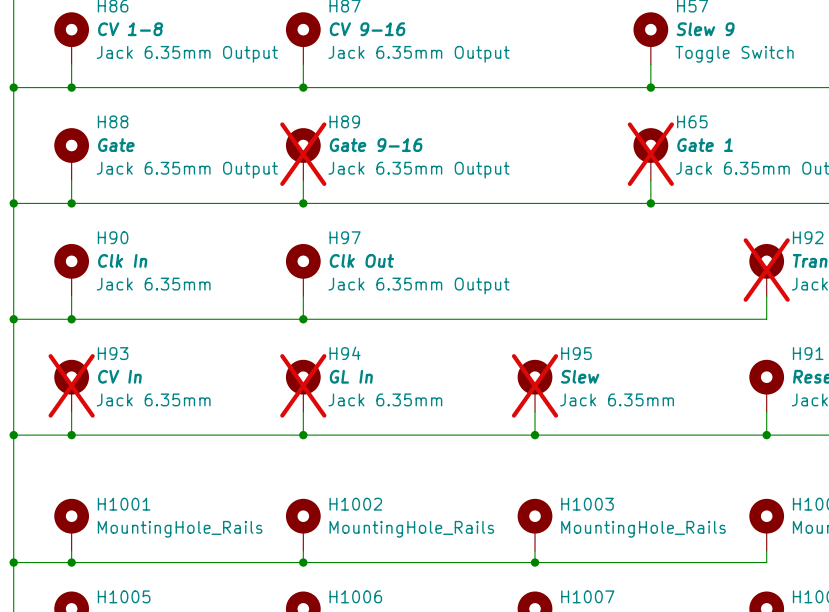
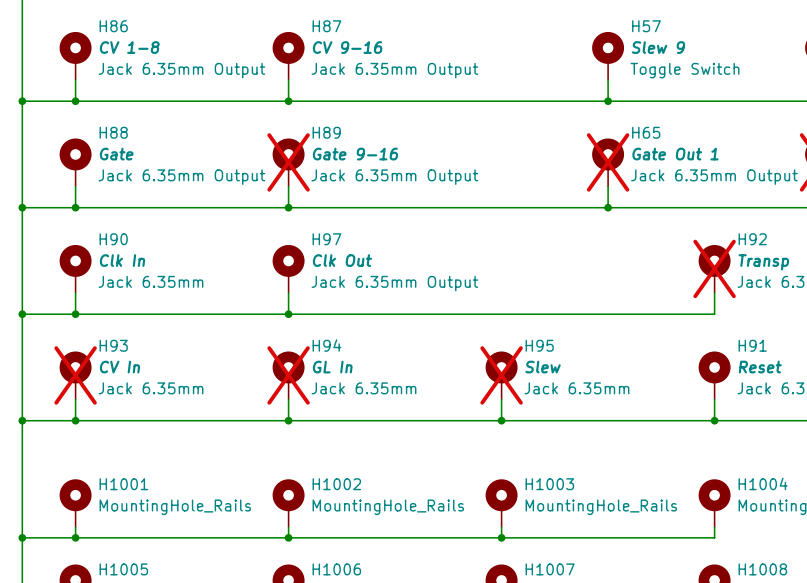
H65 value: Gate 1 (705, 145) -> Gate Out 1 (675, 154)

